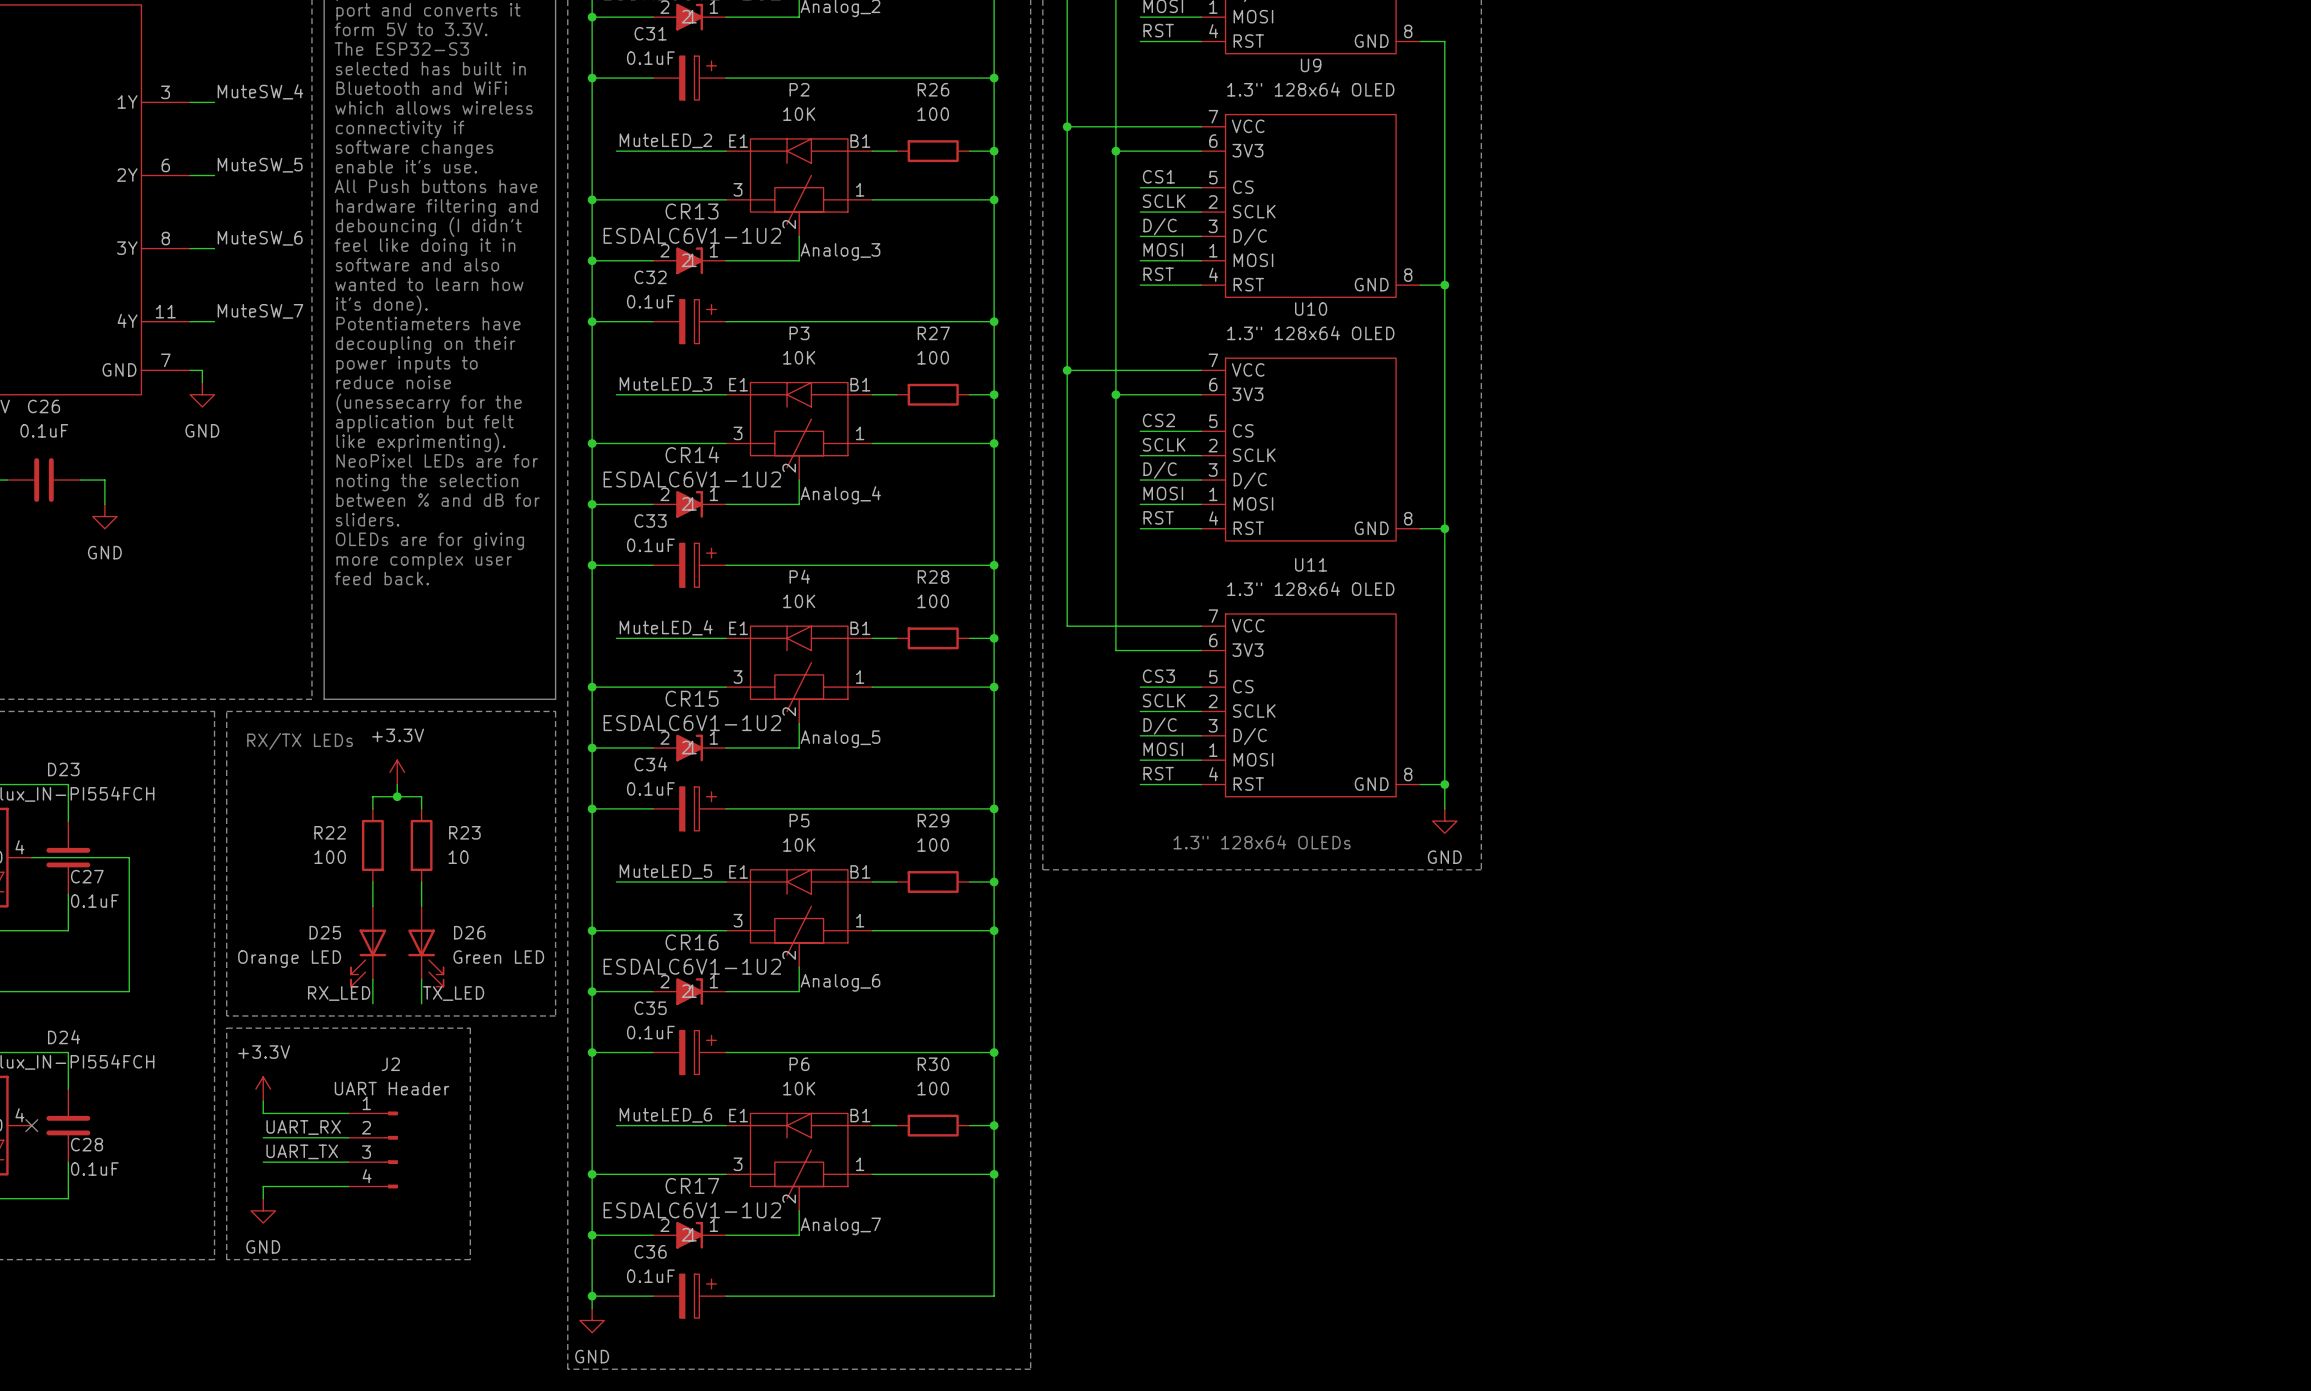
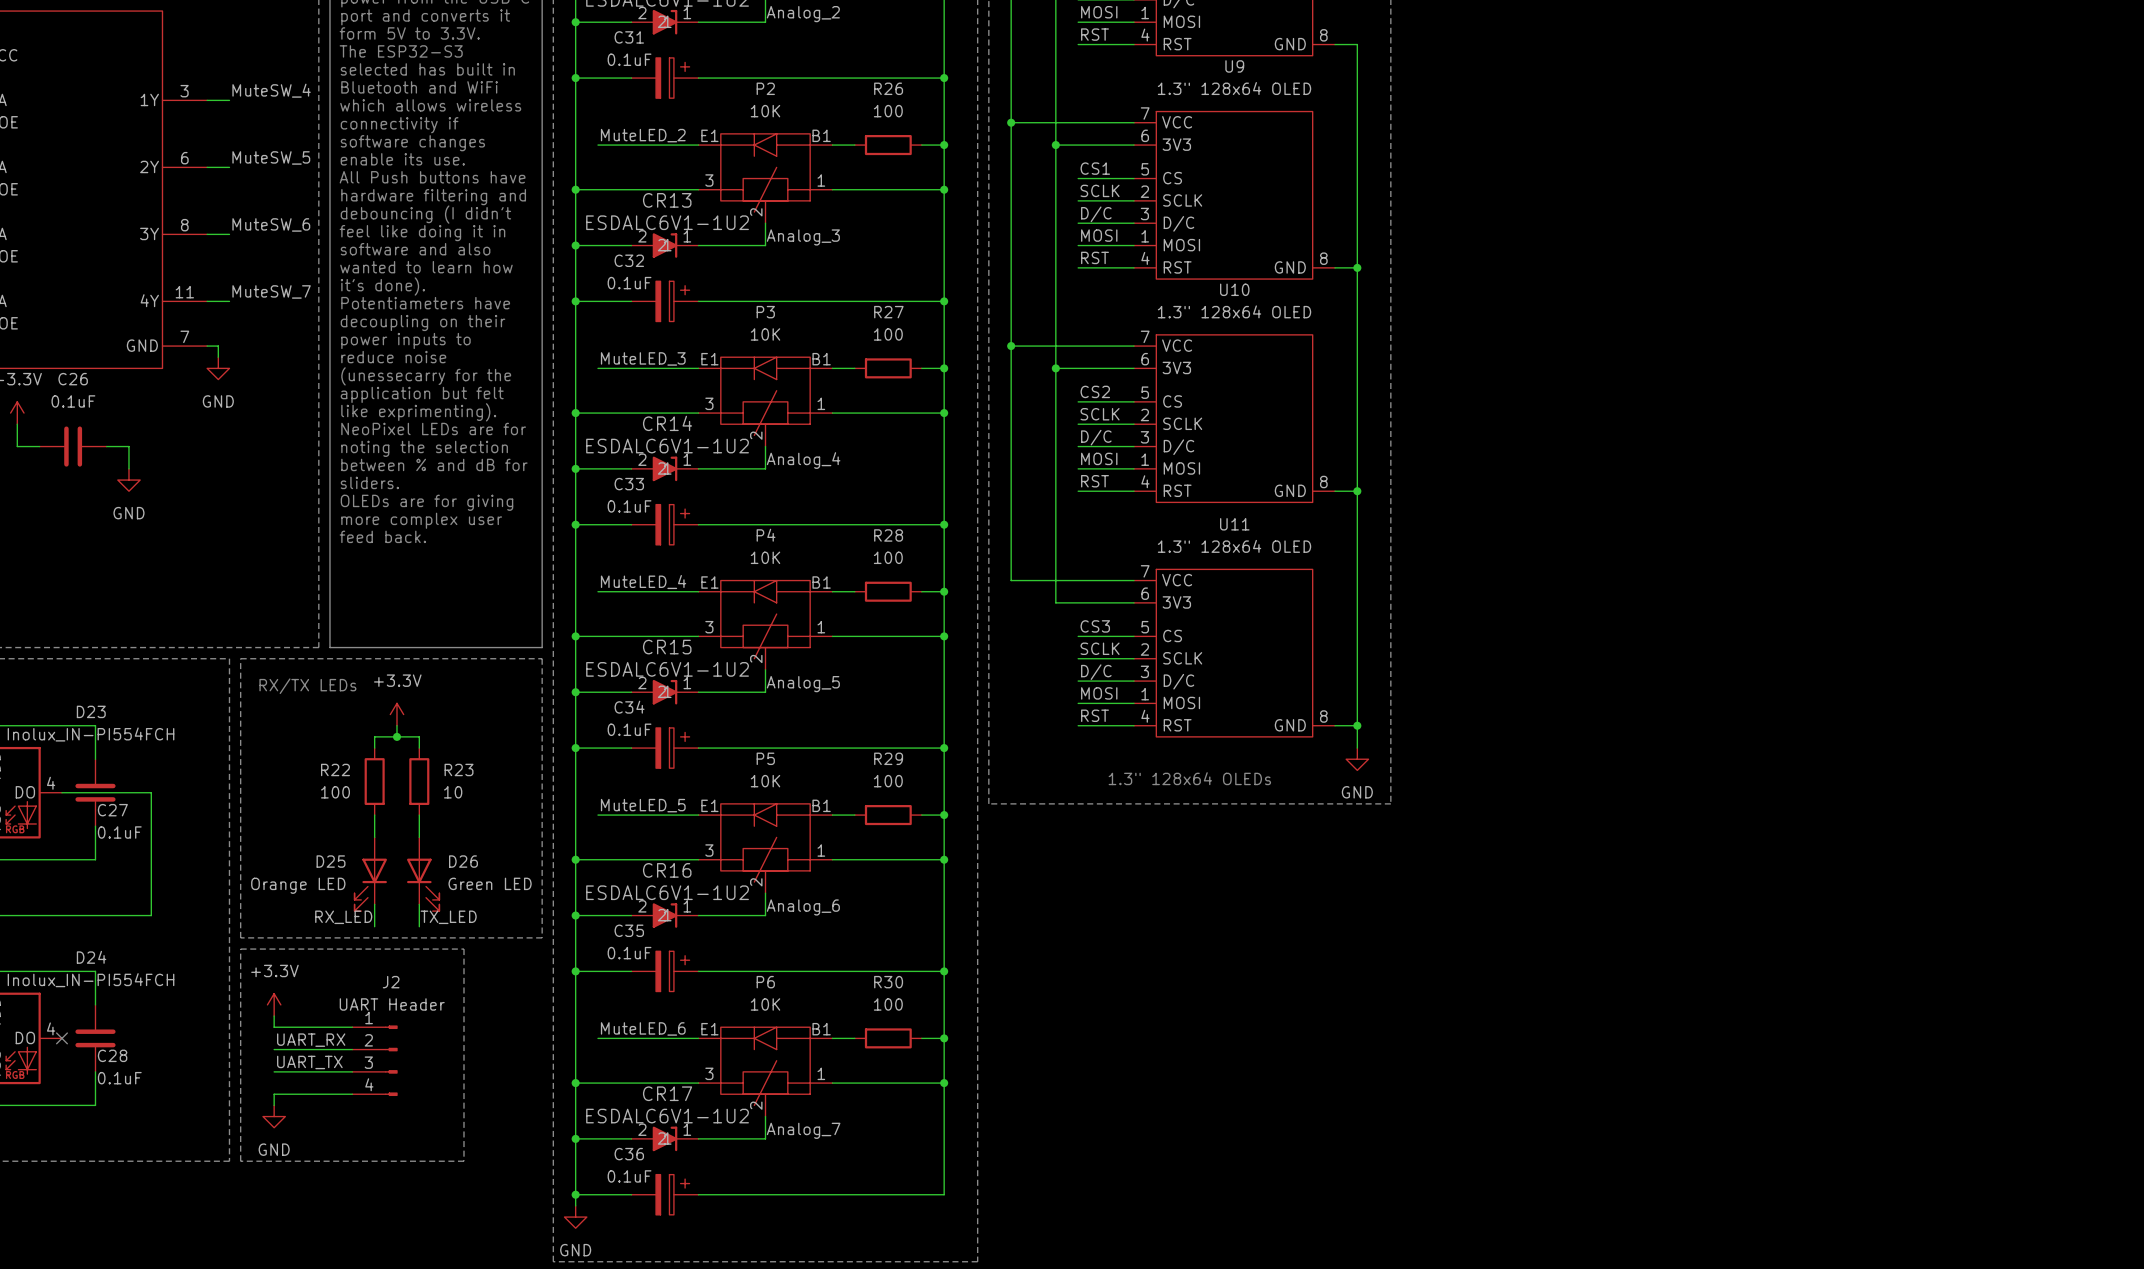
text: enable it's use. (406, 166) -> enable its use. (402, 159)

